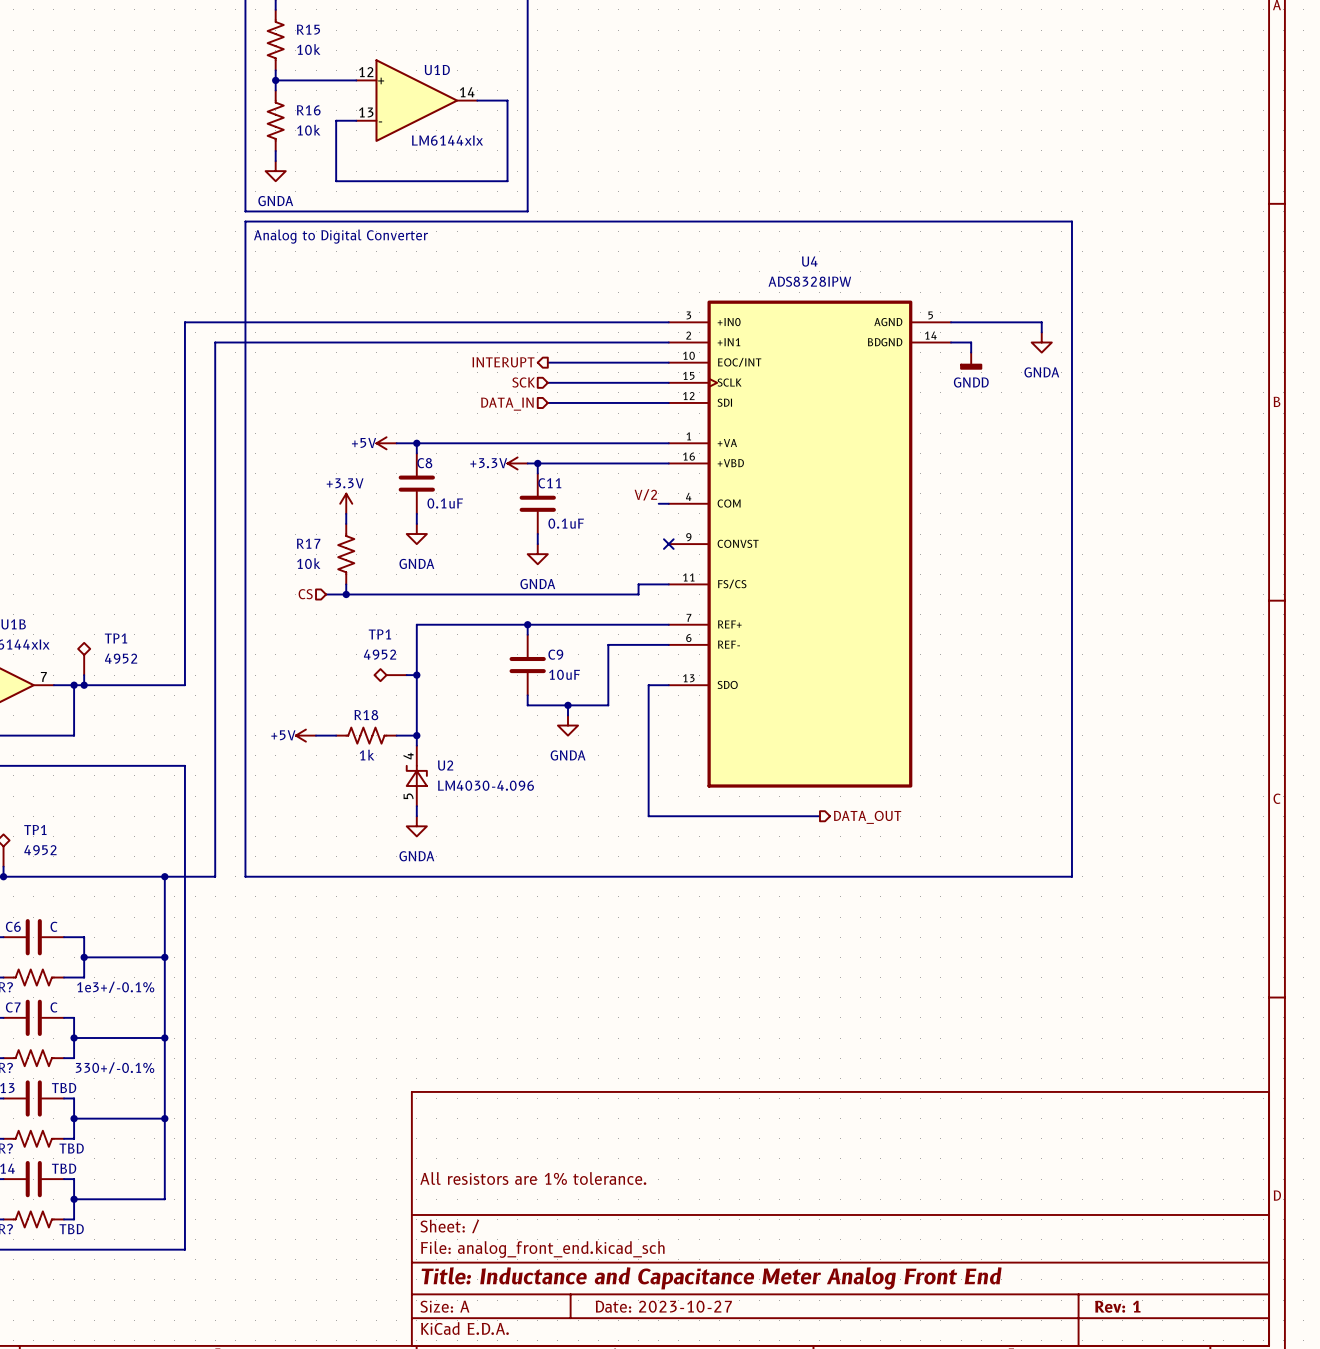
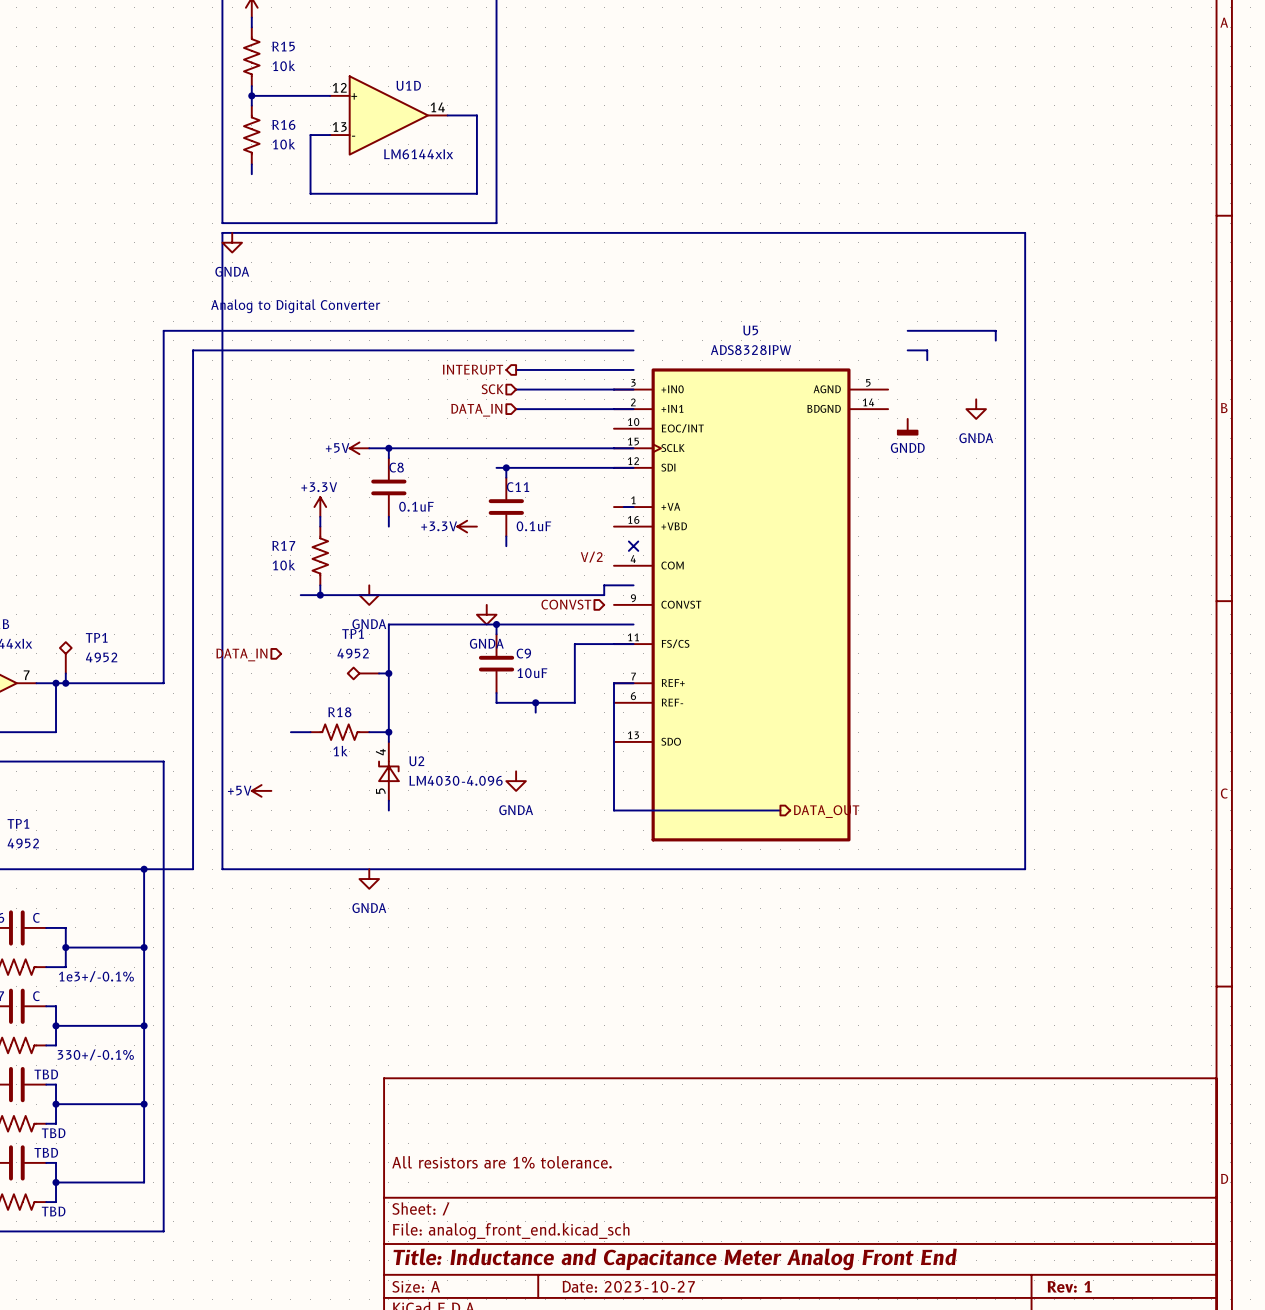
power symbol position: GNDA (275, 171) -> GNDA (232, 242)
text position: Analog to Digital Converter (341, 236) -> Analog to Digital Converter (295, 306)
power symbol position: GNDA (1041, 342) -> GNDA (976, 409)
power symbol position: GNDD (971, 361) -> GNDD (907, 427)
power symbol position: +3.3V (517, 463) -> +3.3V (467, 526)
label position: V/2 (645, 494) -> V/2 (591, 557)
power symbol position: GNDA (416, 534) -> GNDA (369, 595)
U4: ADS8328IPW (809, 544) -> none
power symbol: GNDA (537, 554) -> none
hierarchical label: CS (305, 594) -> none
hierarchical label: none -> CONVST (566, 604)
U5: none -> ADS8328IPW (751, 604)
power symbol: none -> GNDA (486, 614)
hierarchical label: none -> DATA_IN (241, 654)
power symbol: GNDA (568, 725) -> none
power symbol position: +5V (305, 735) -> +5V (261, 790)
power symbol: none -> GNDA (516, 781)
power symbol position: GNDA (416, 826) -> GNDA (369, 879)

